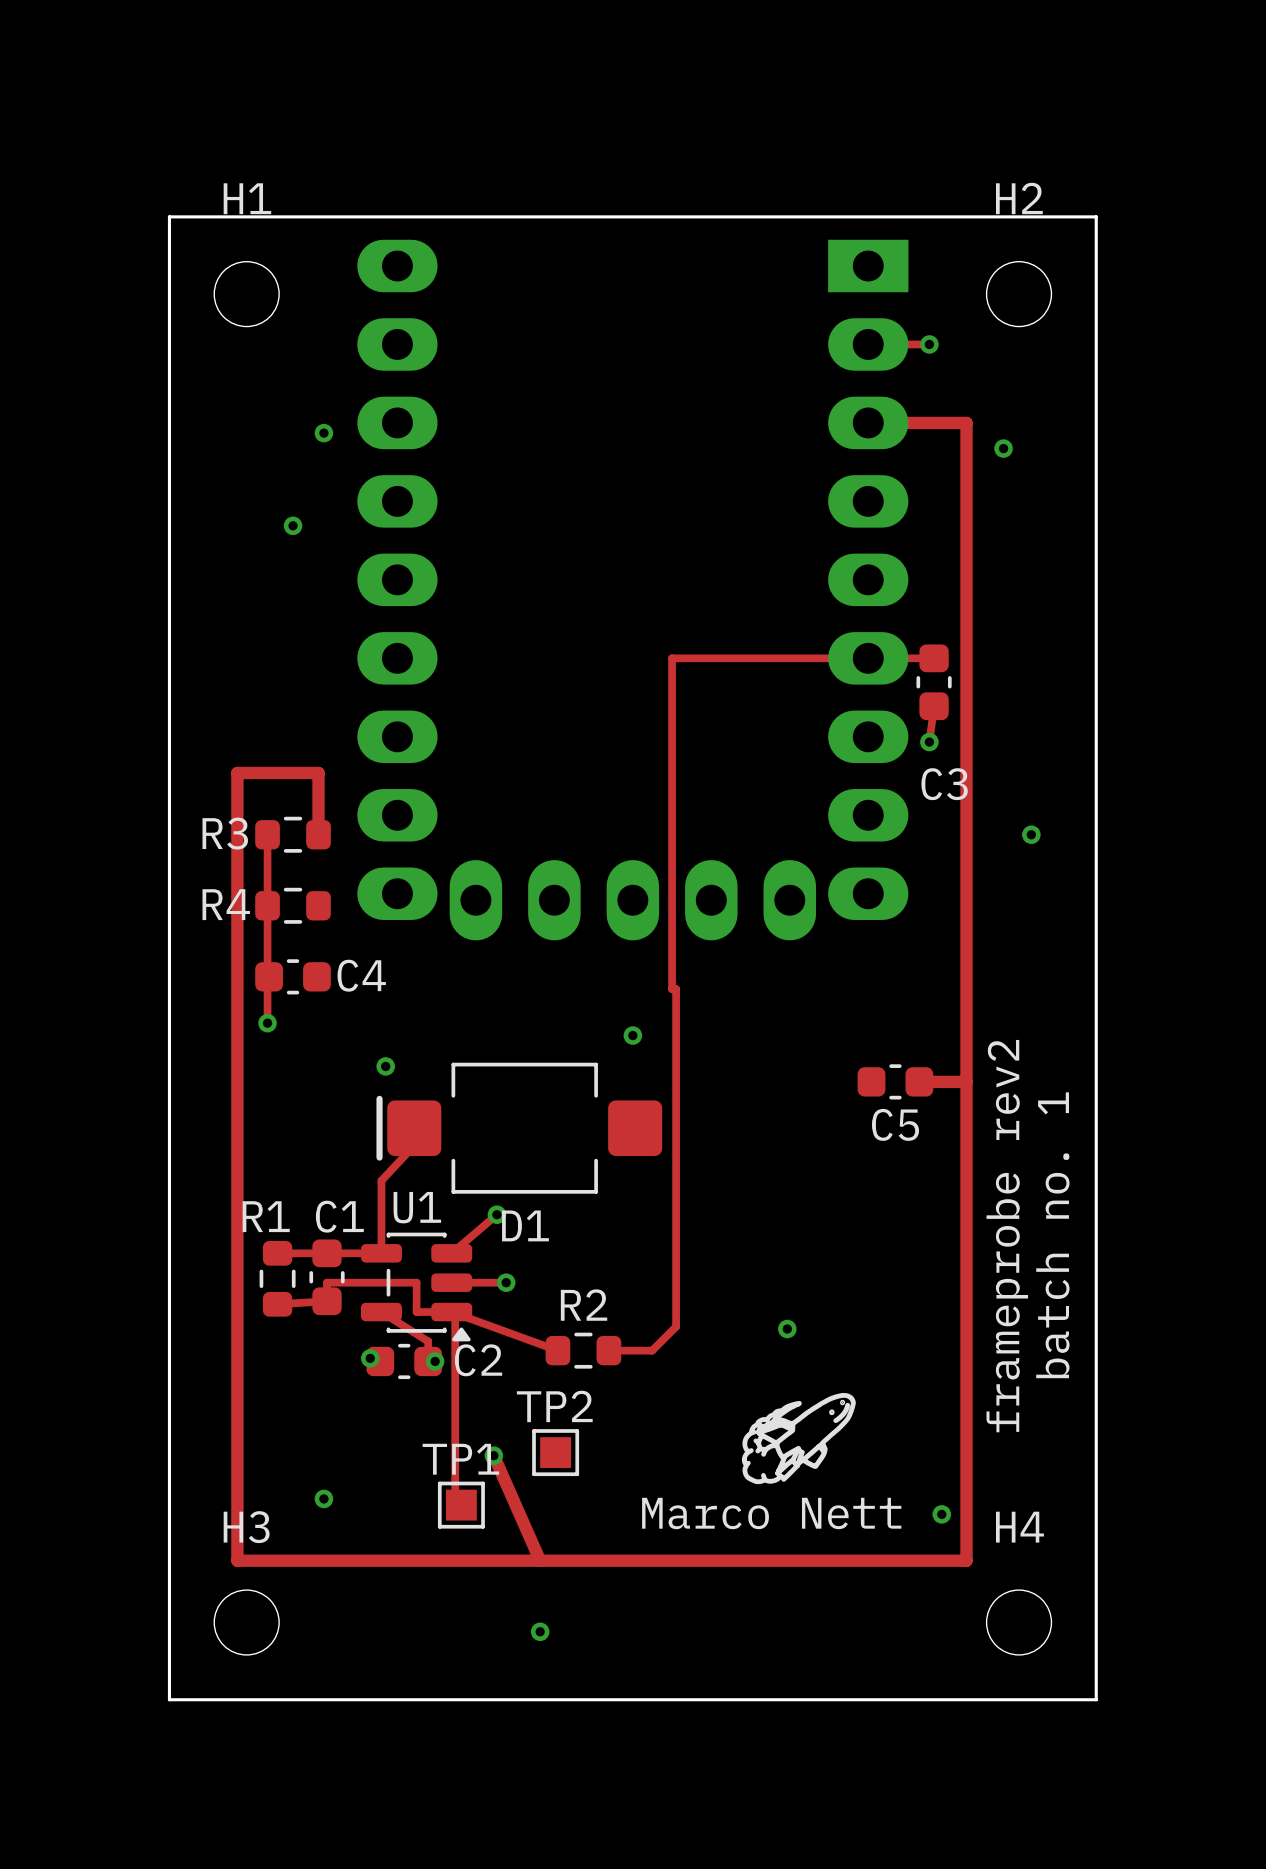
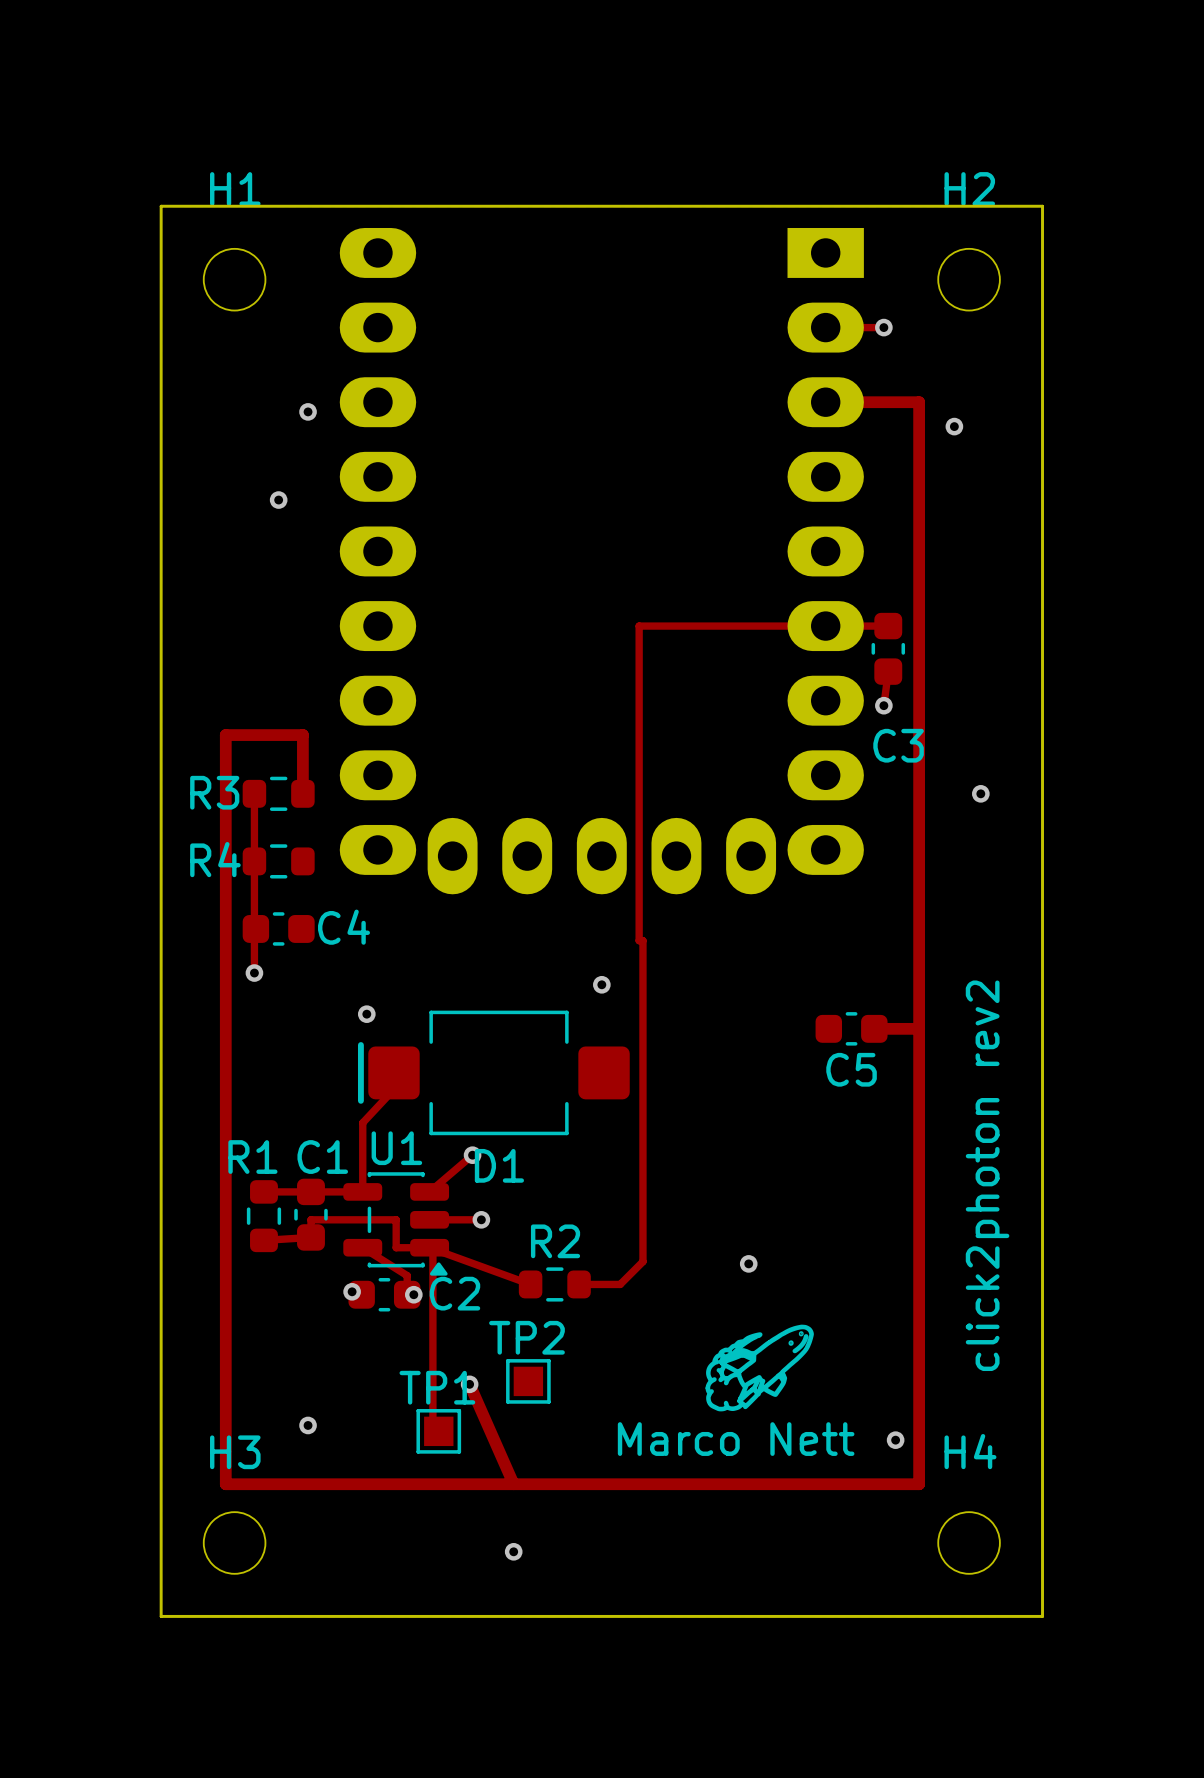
text: none -> click2photon rev2 (987, 1175)
text: batch no. 1 (1052, 1235) -> none
text: frameprobe rev2 (1007, 1236) -> none

